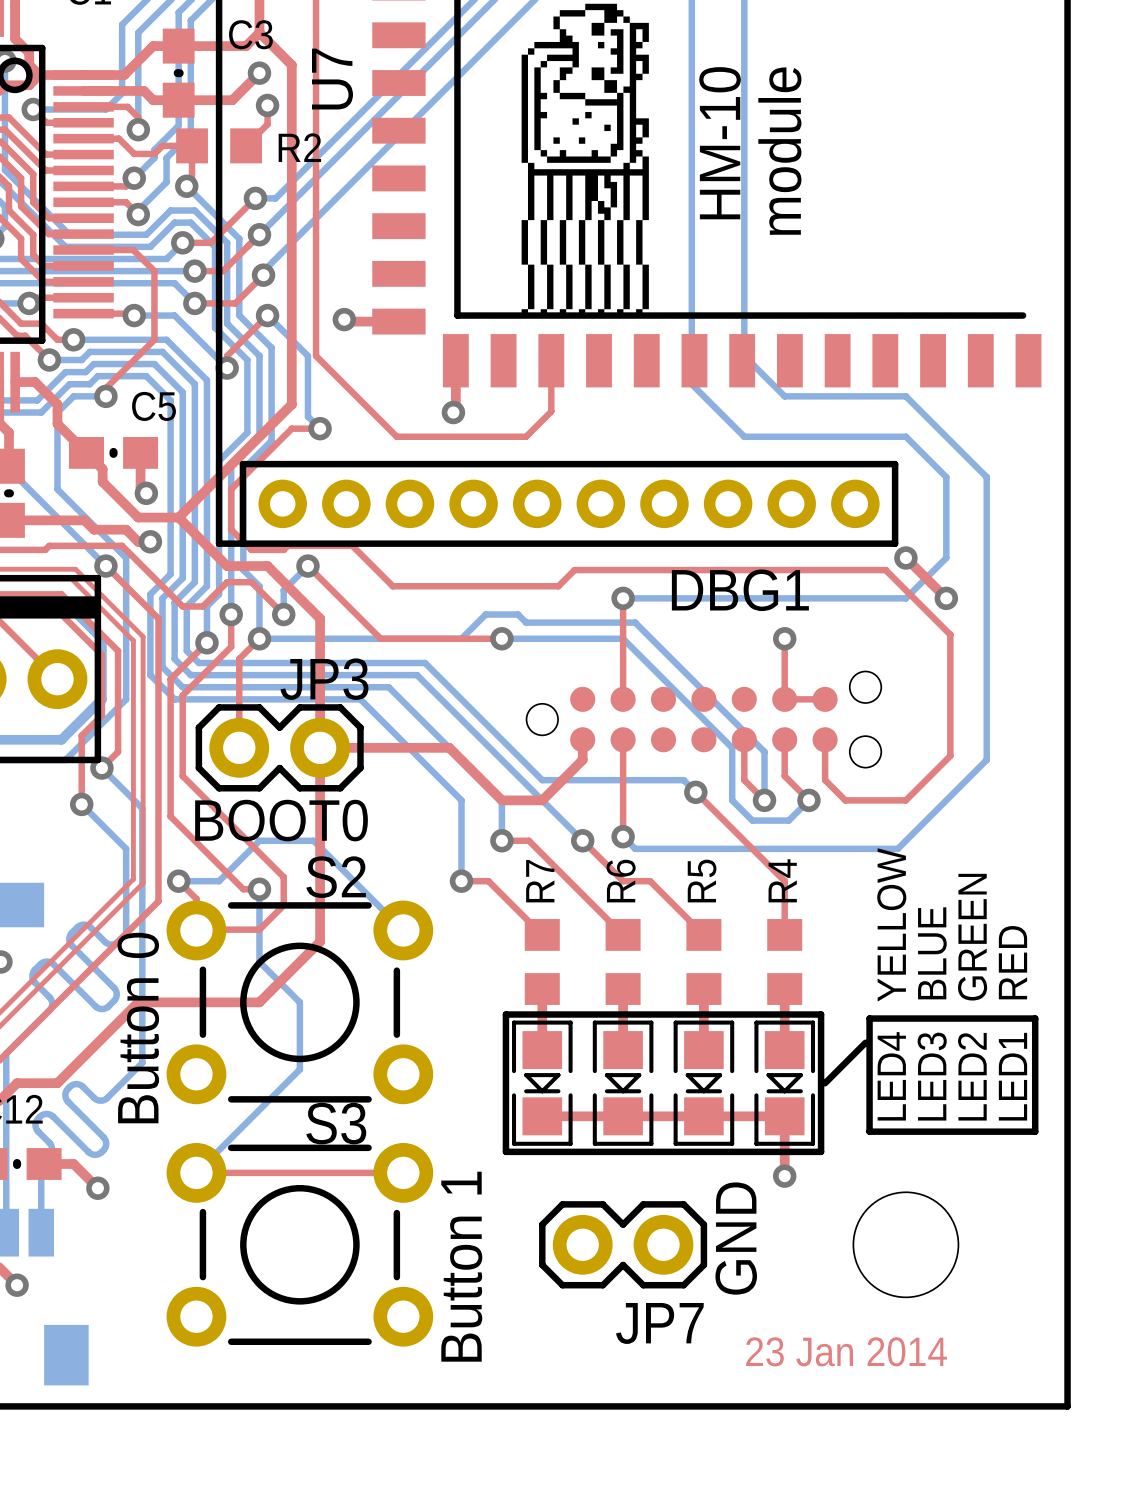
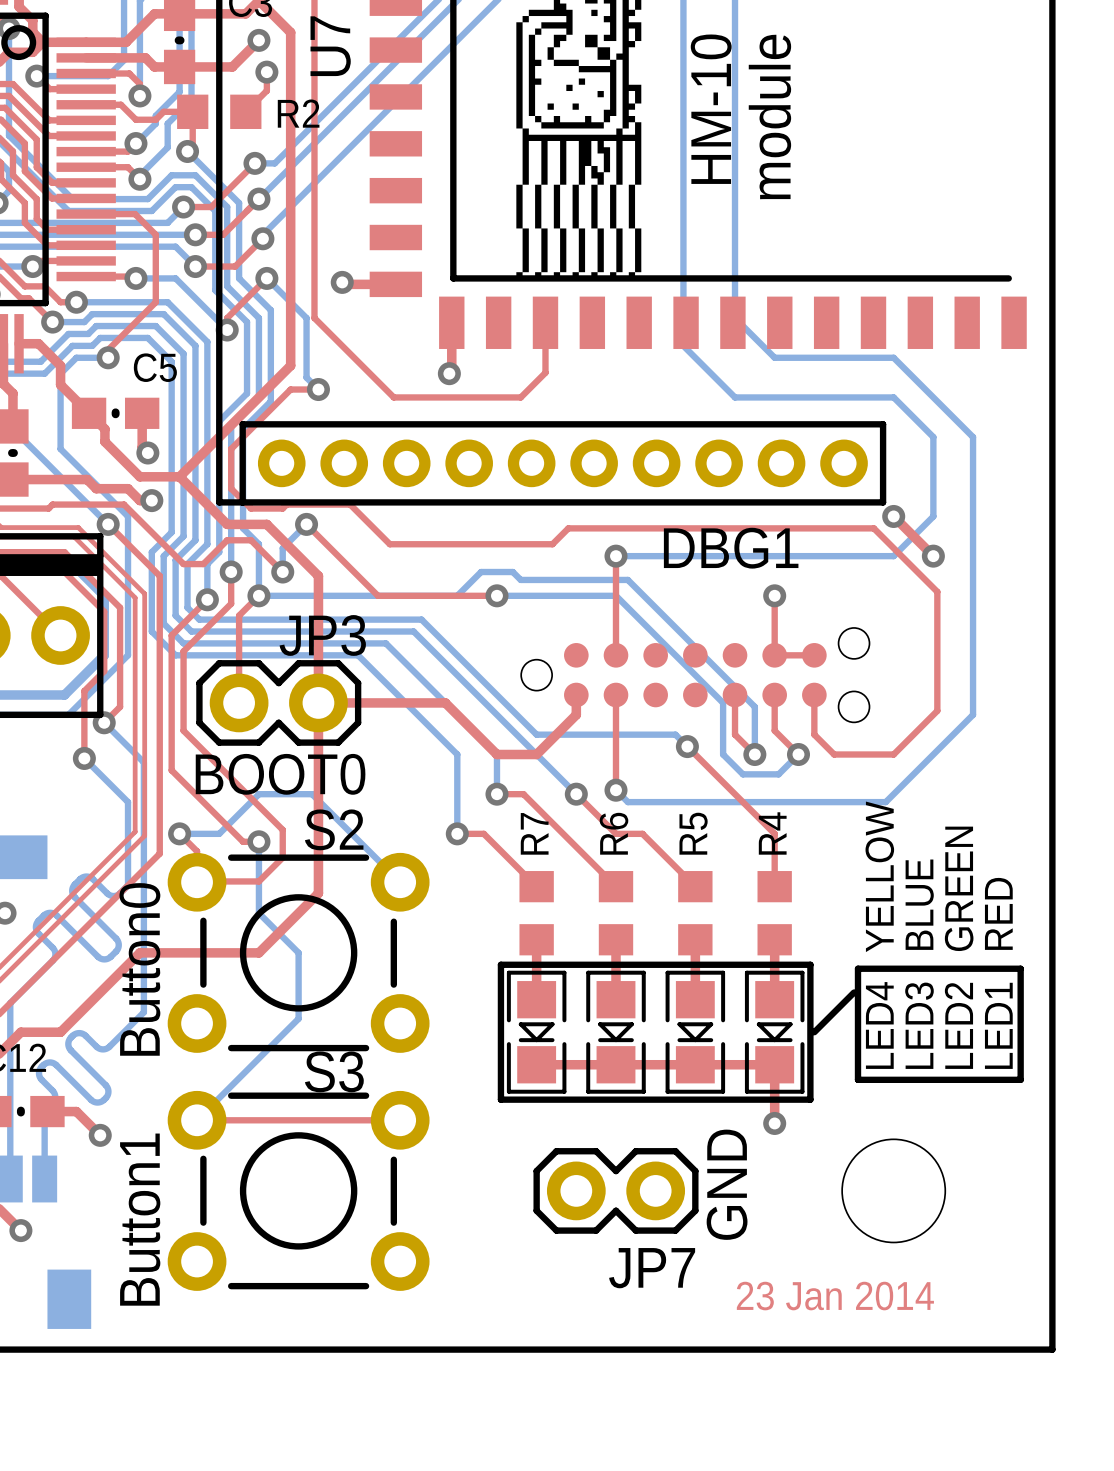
text: Button 0 (138, 1028) -> Button0 (139, 969)
text: Button 1 (461, 1266) -> none
text: none -> Button1 (140, 1219)

